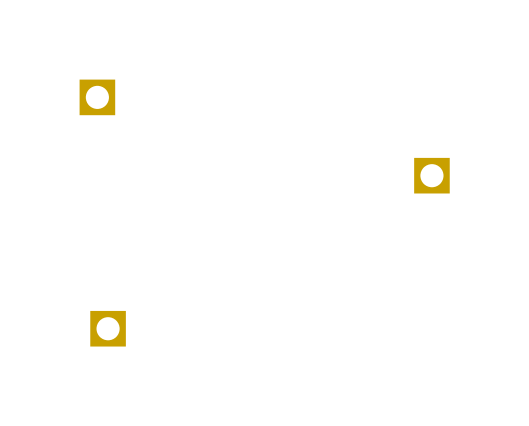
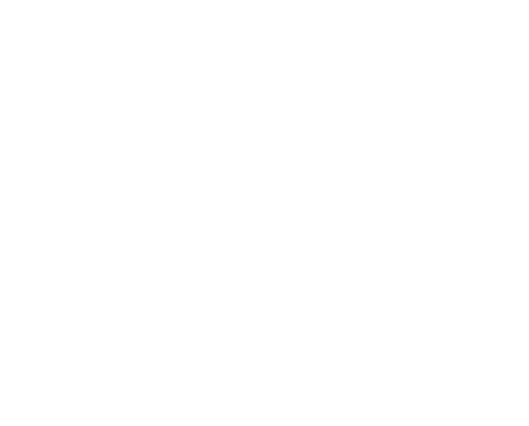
part: (97, 97) -> none
part: (431, 175) -> none
part: (108, 328) -> none

